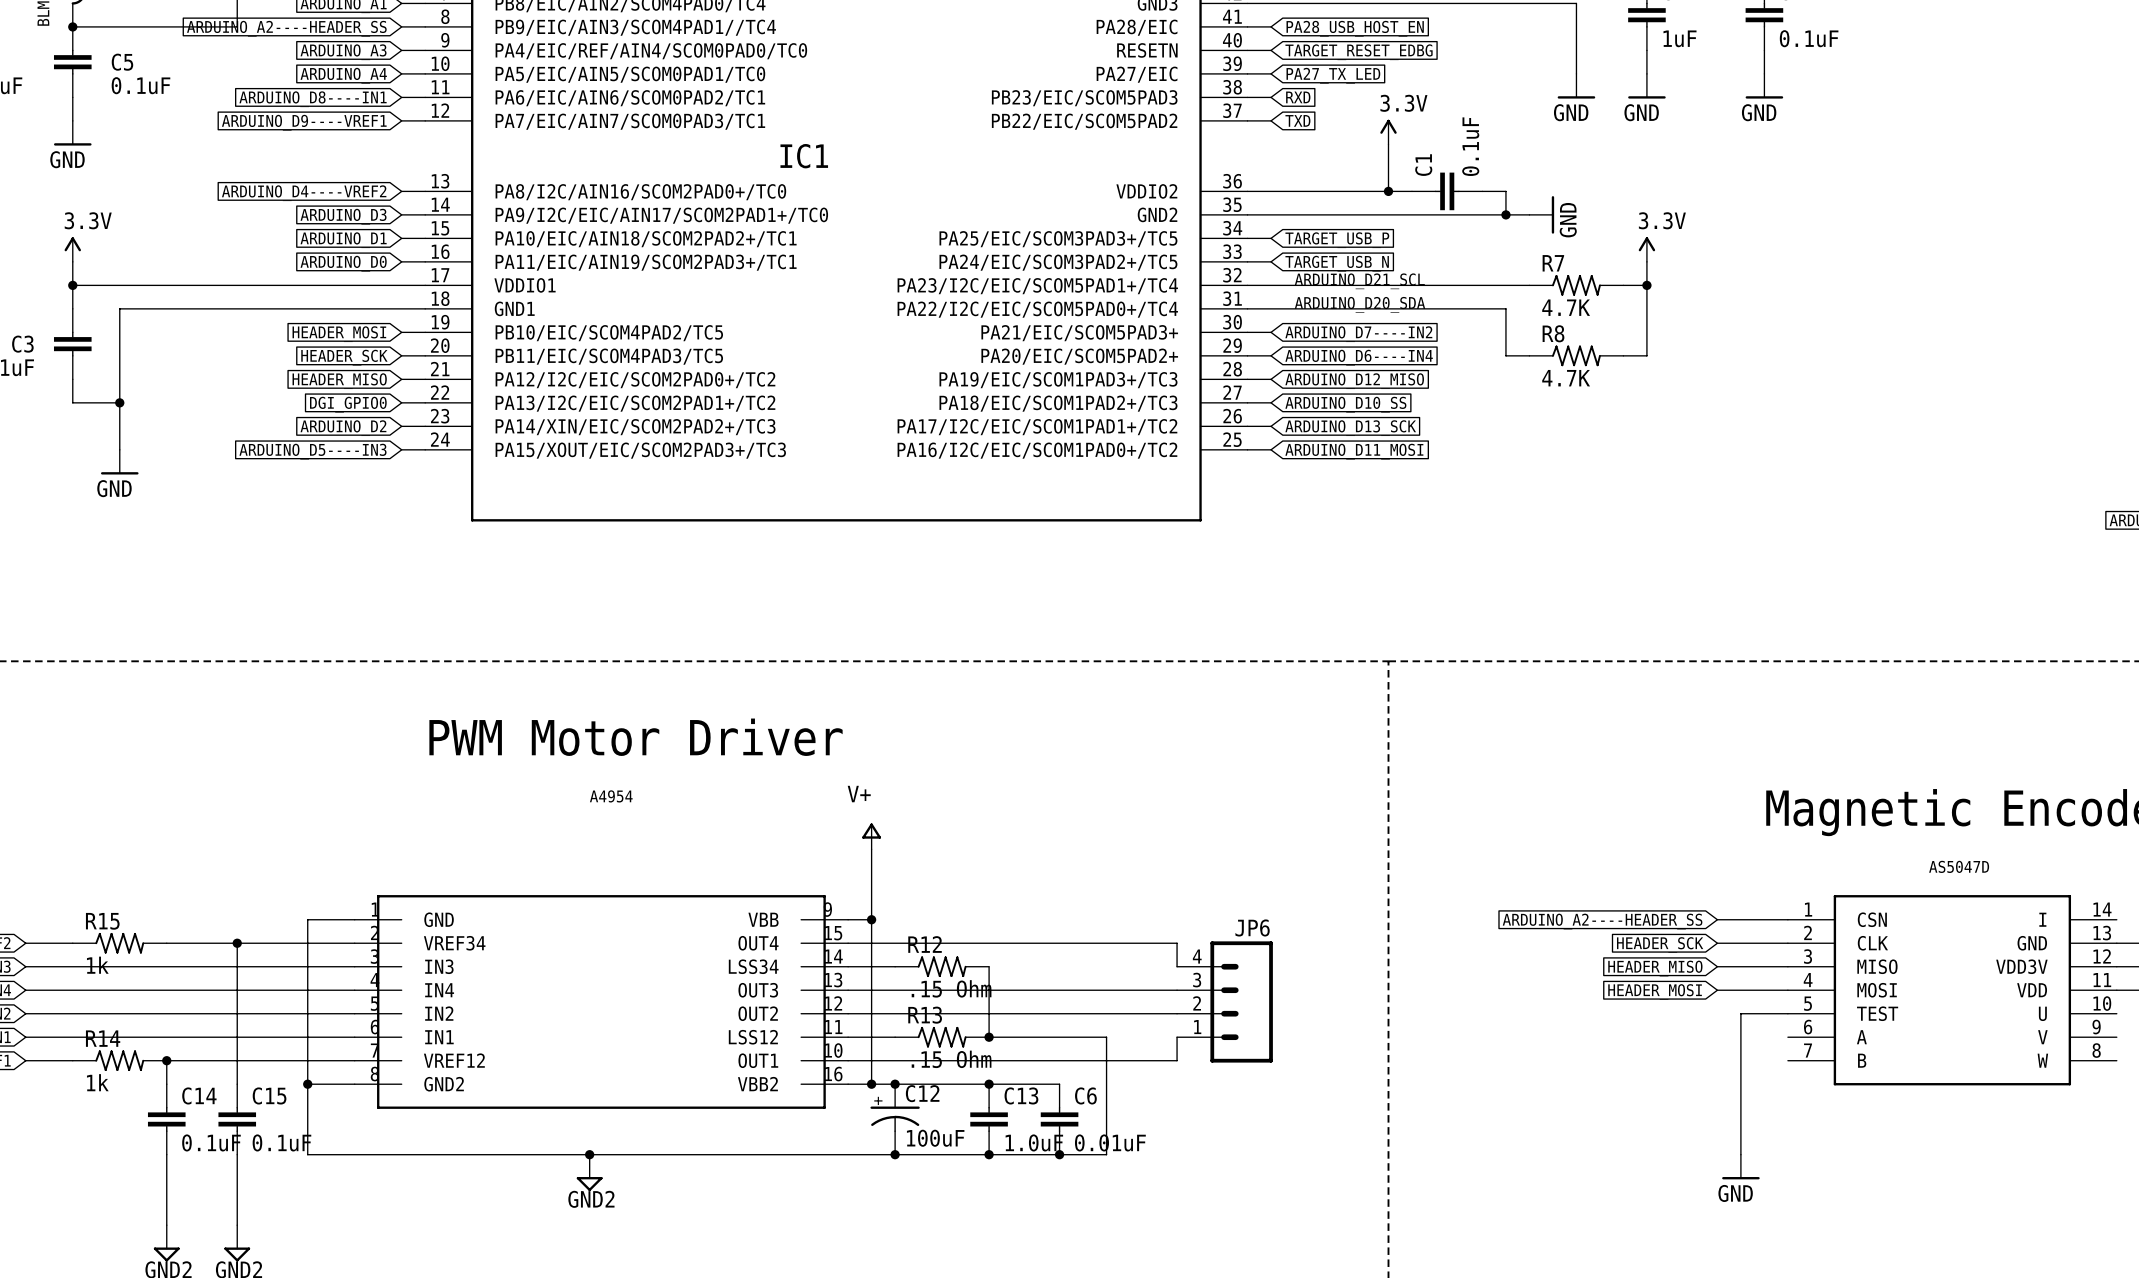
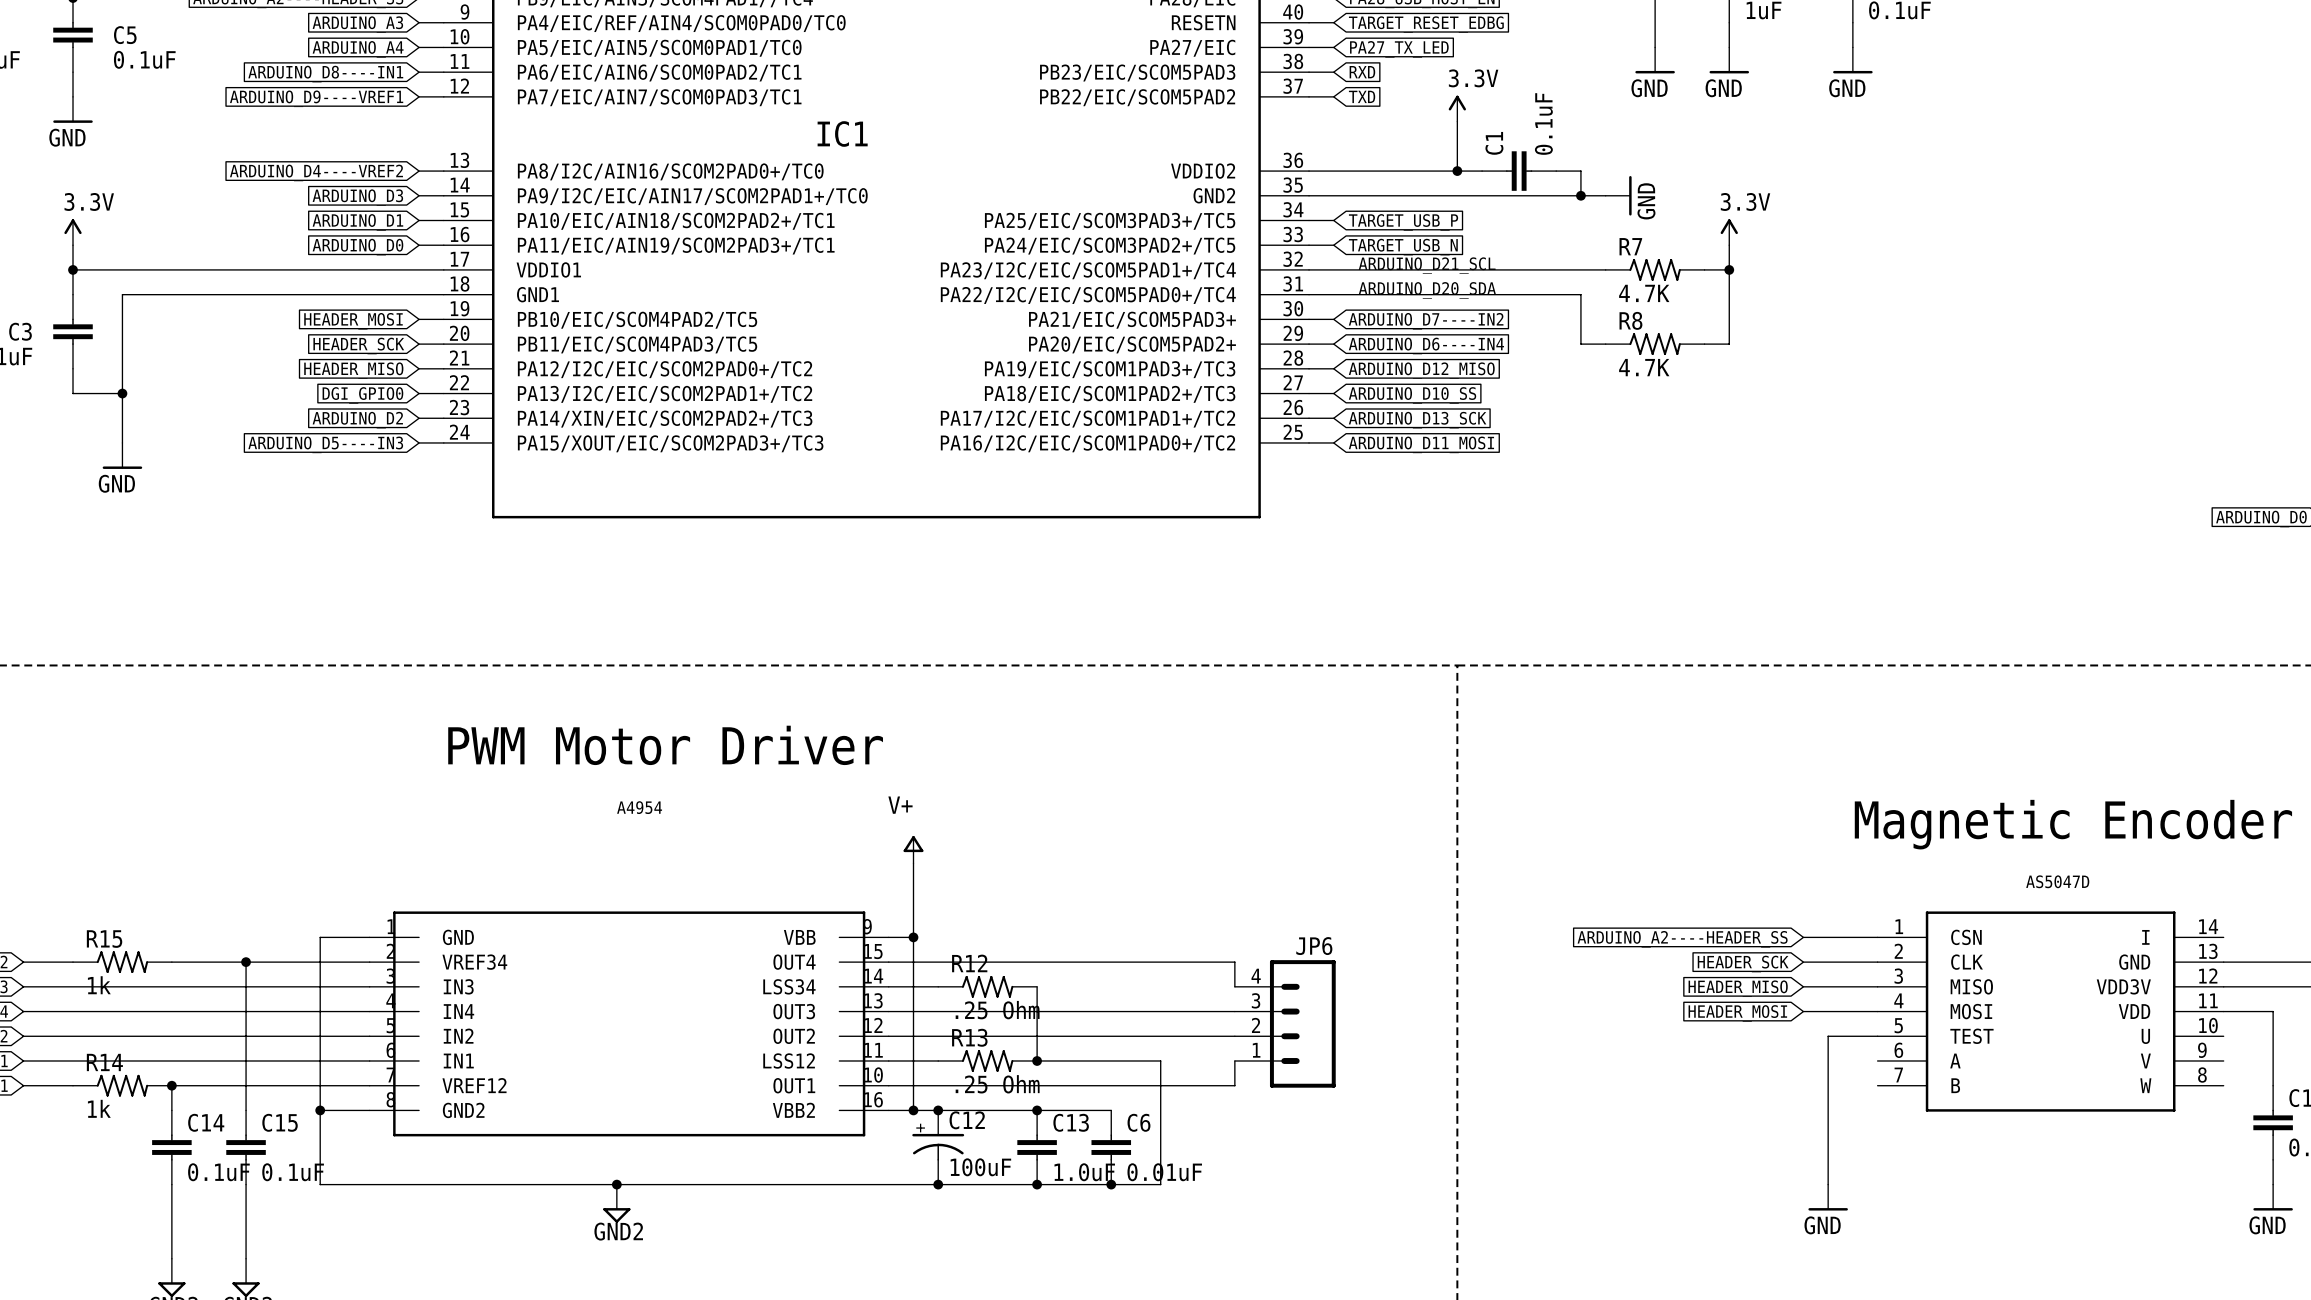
R12 value: .15 Ohm (951, 988) -> .25 Ohm (997, 1010)
R13 value: .15 Ohm (951, 1059) -> .25 Ohm (997, 1084)

